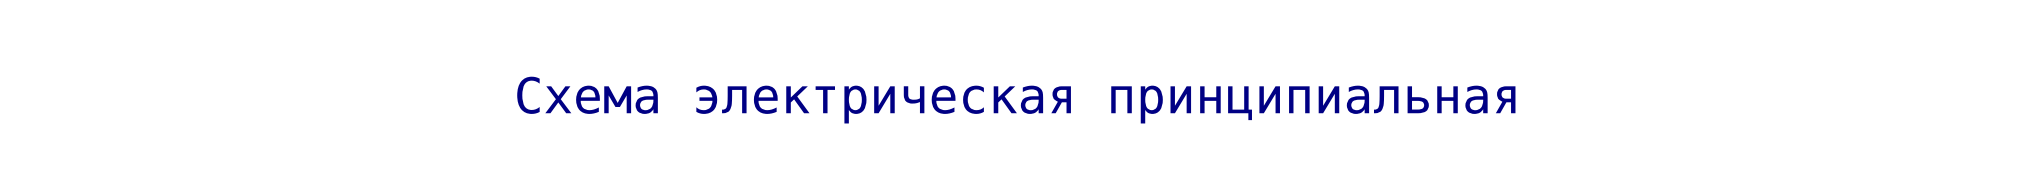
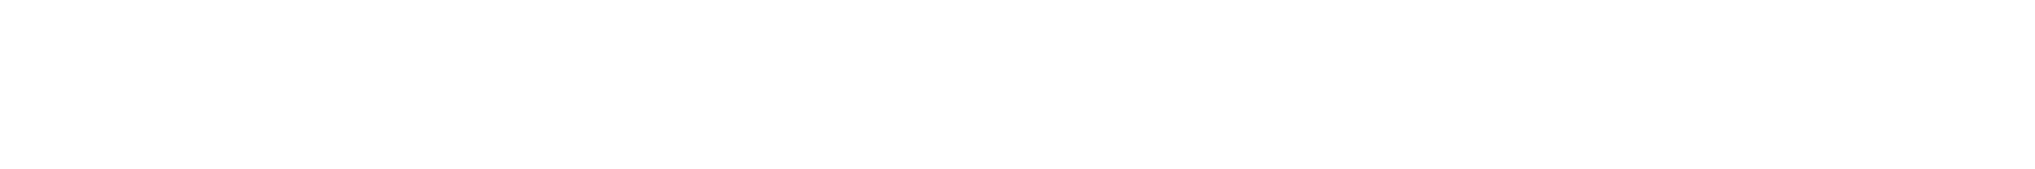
text: Схема электрическая принципиальная (1016, 100) -> none

